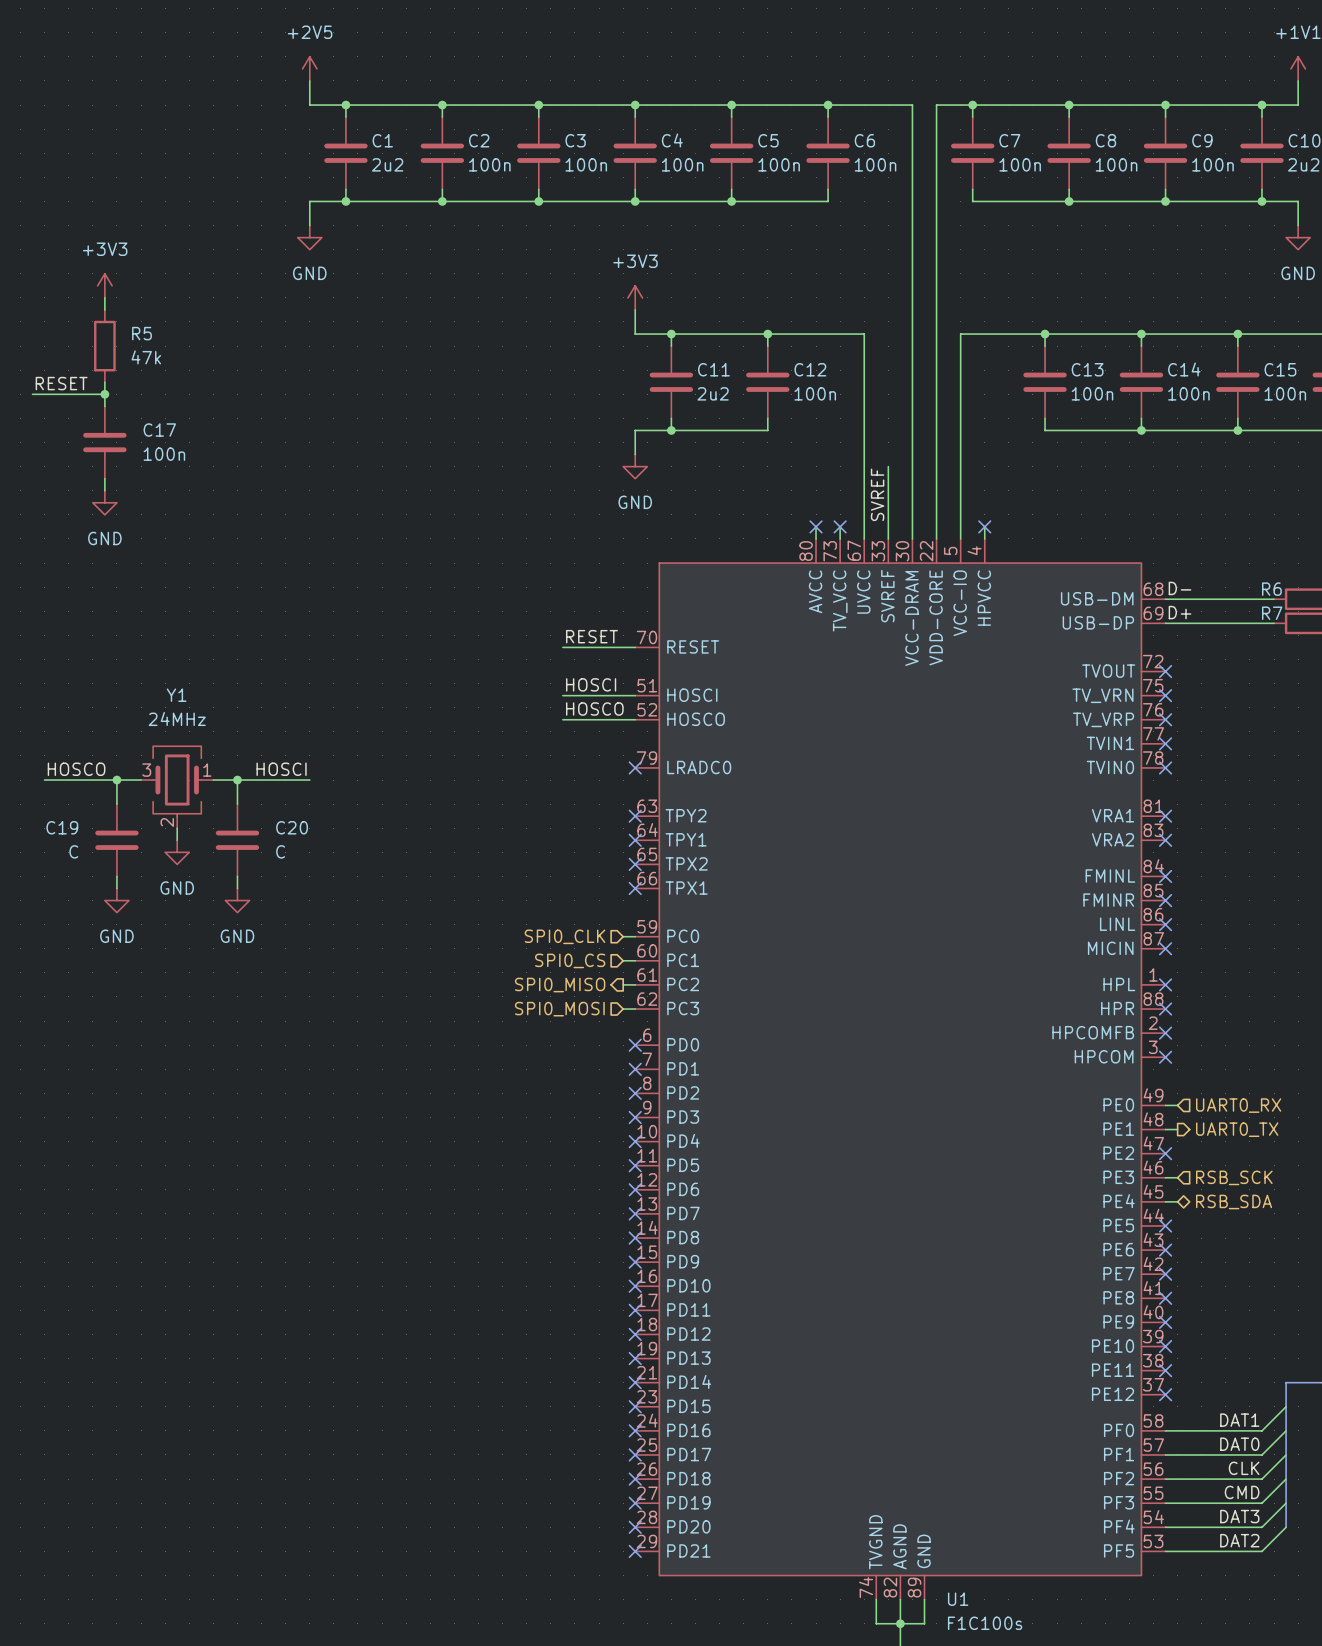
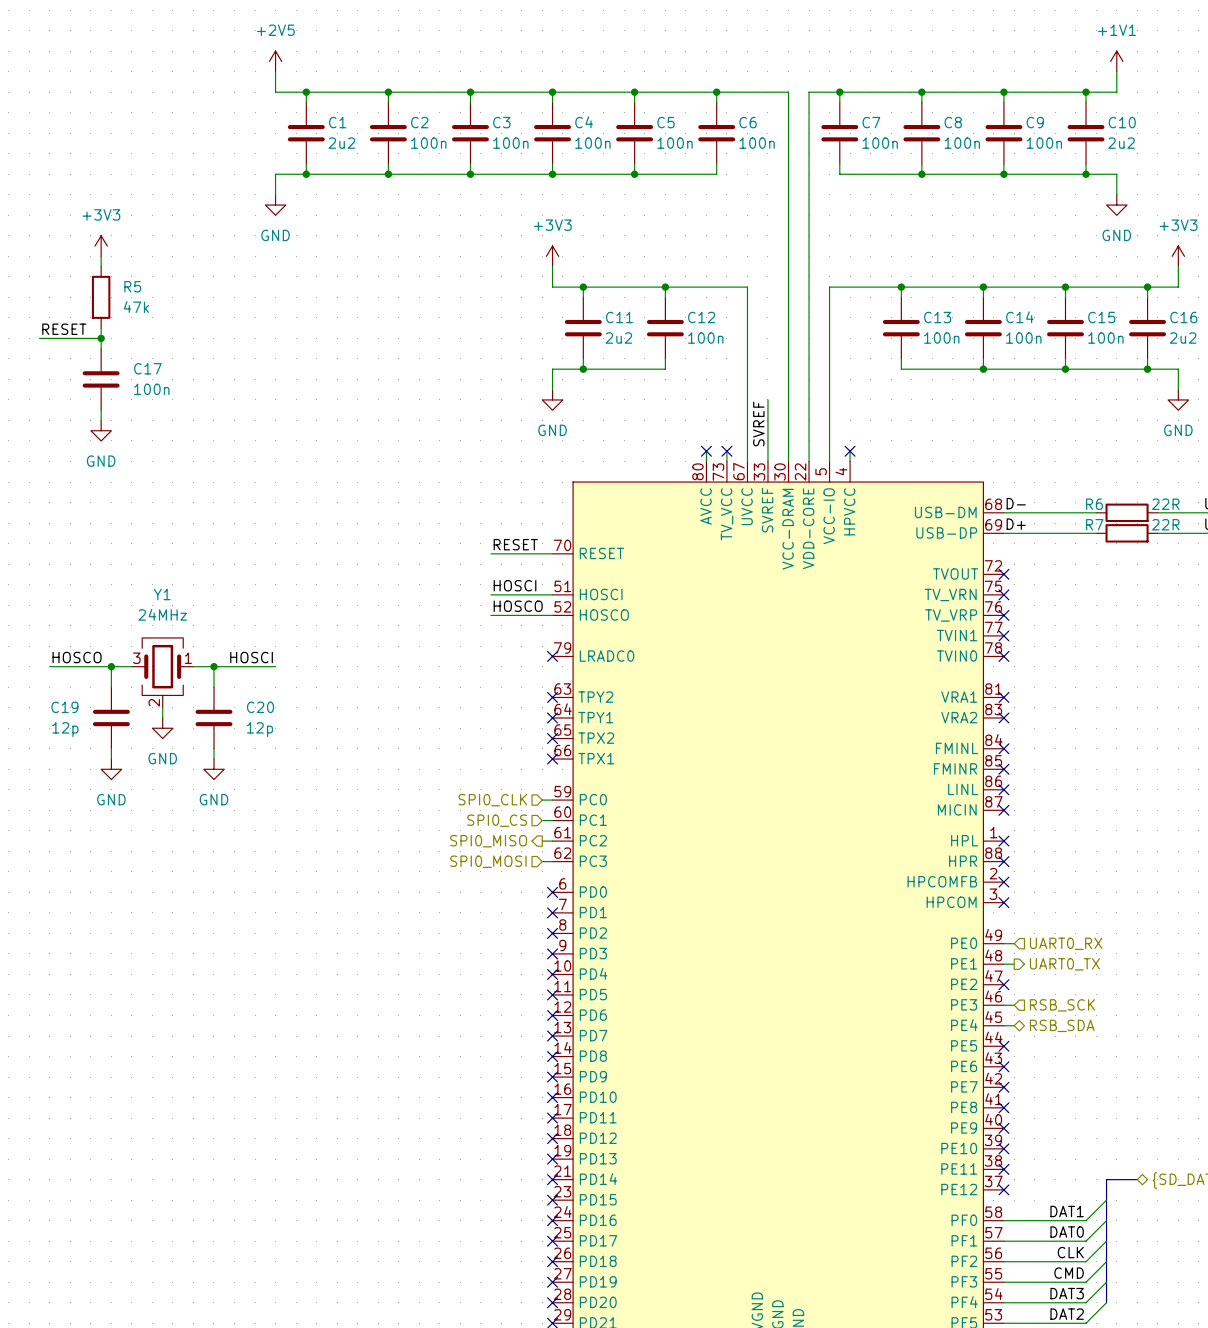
C19 value: C (73, 851) -> 12p (65, 729)
C20 value: C (280, 851) -> 12p (259, 729)

